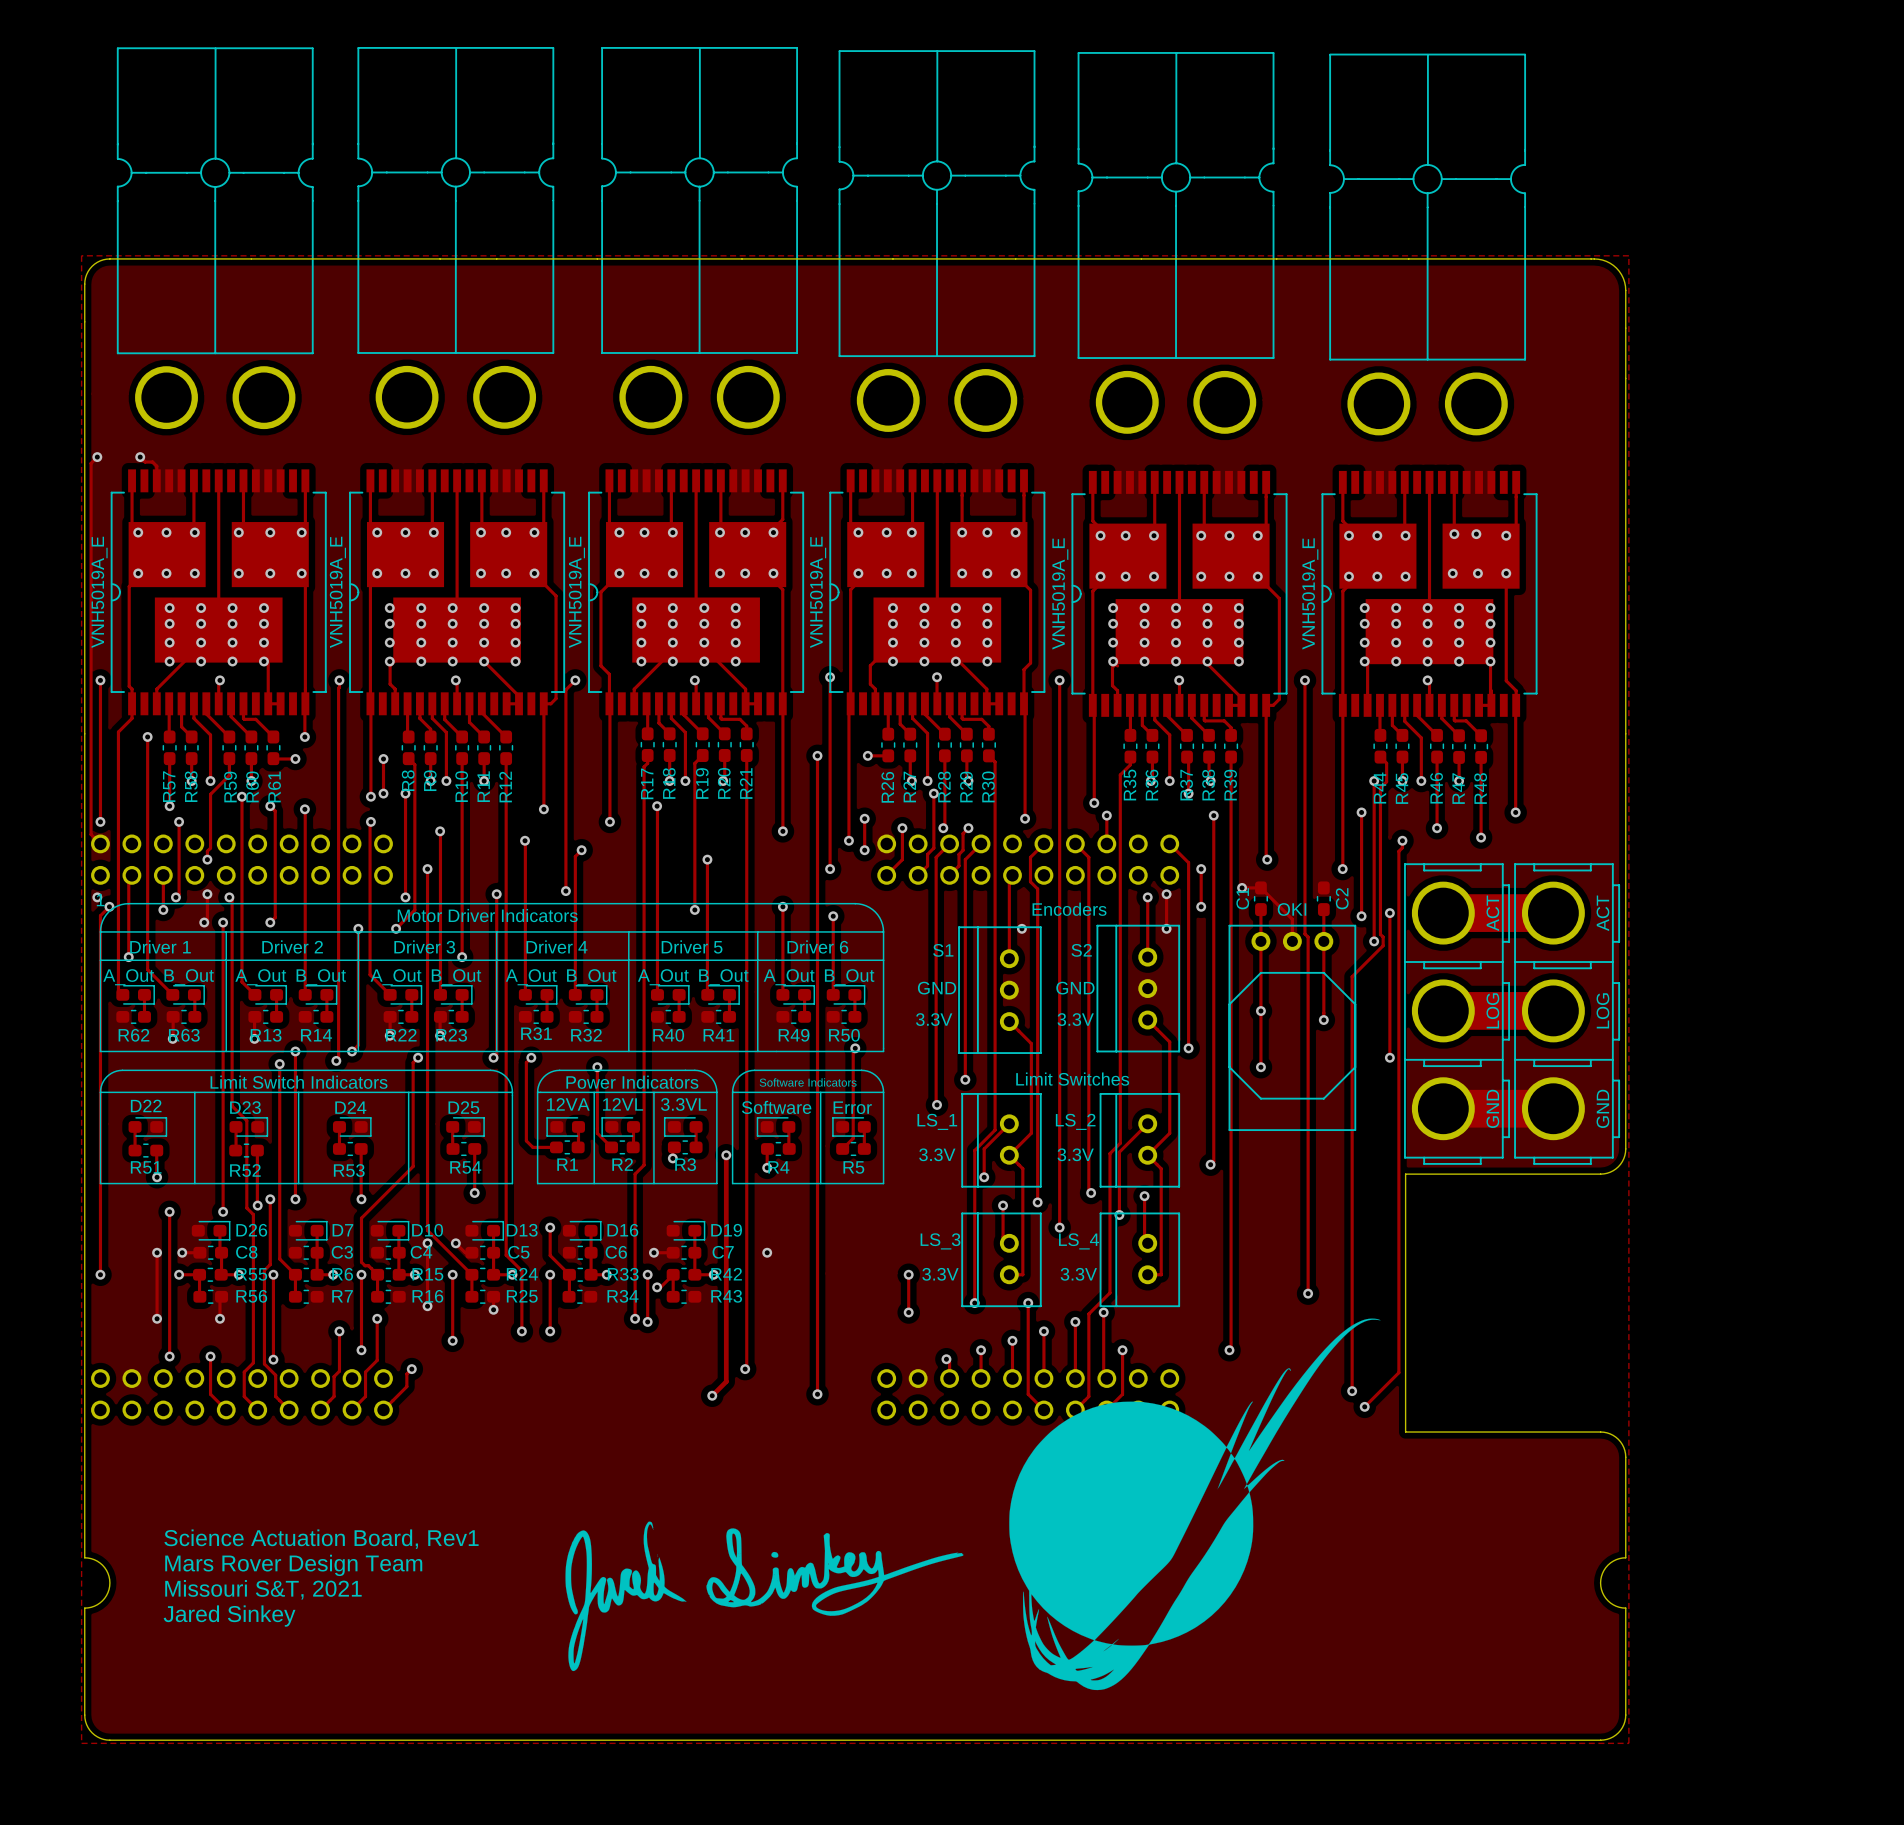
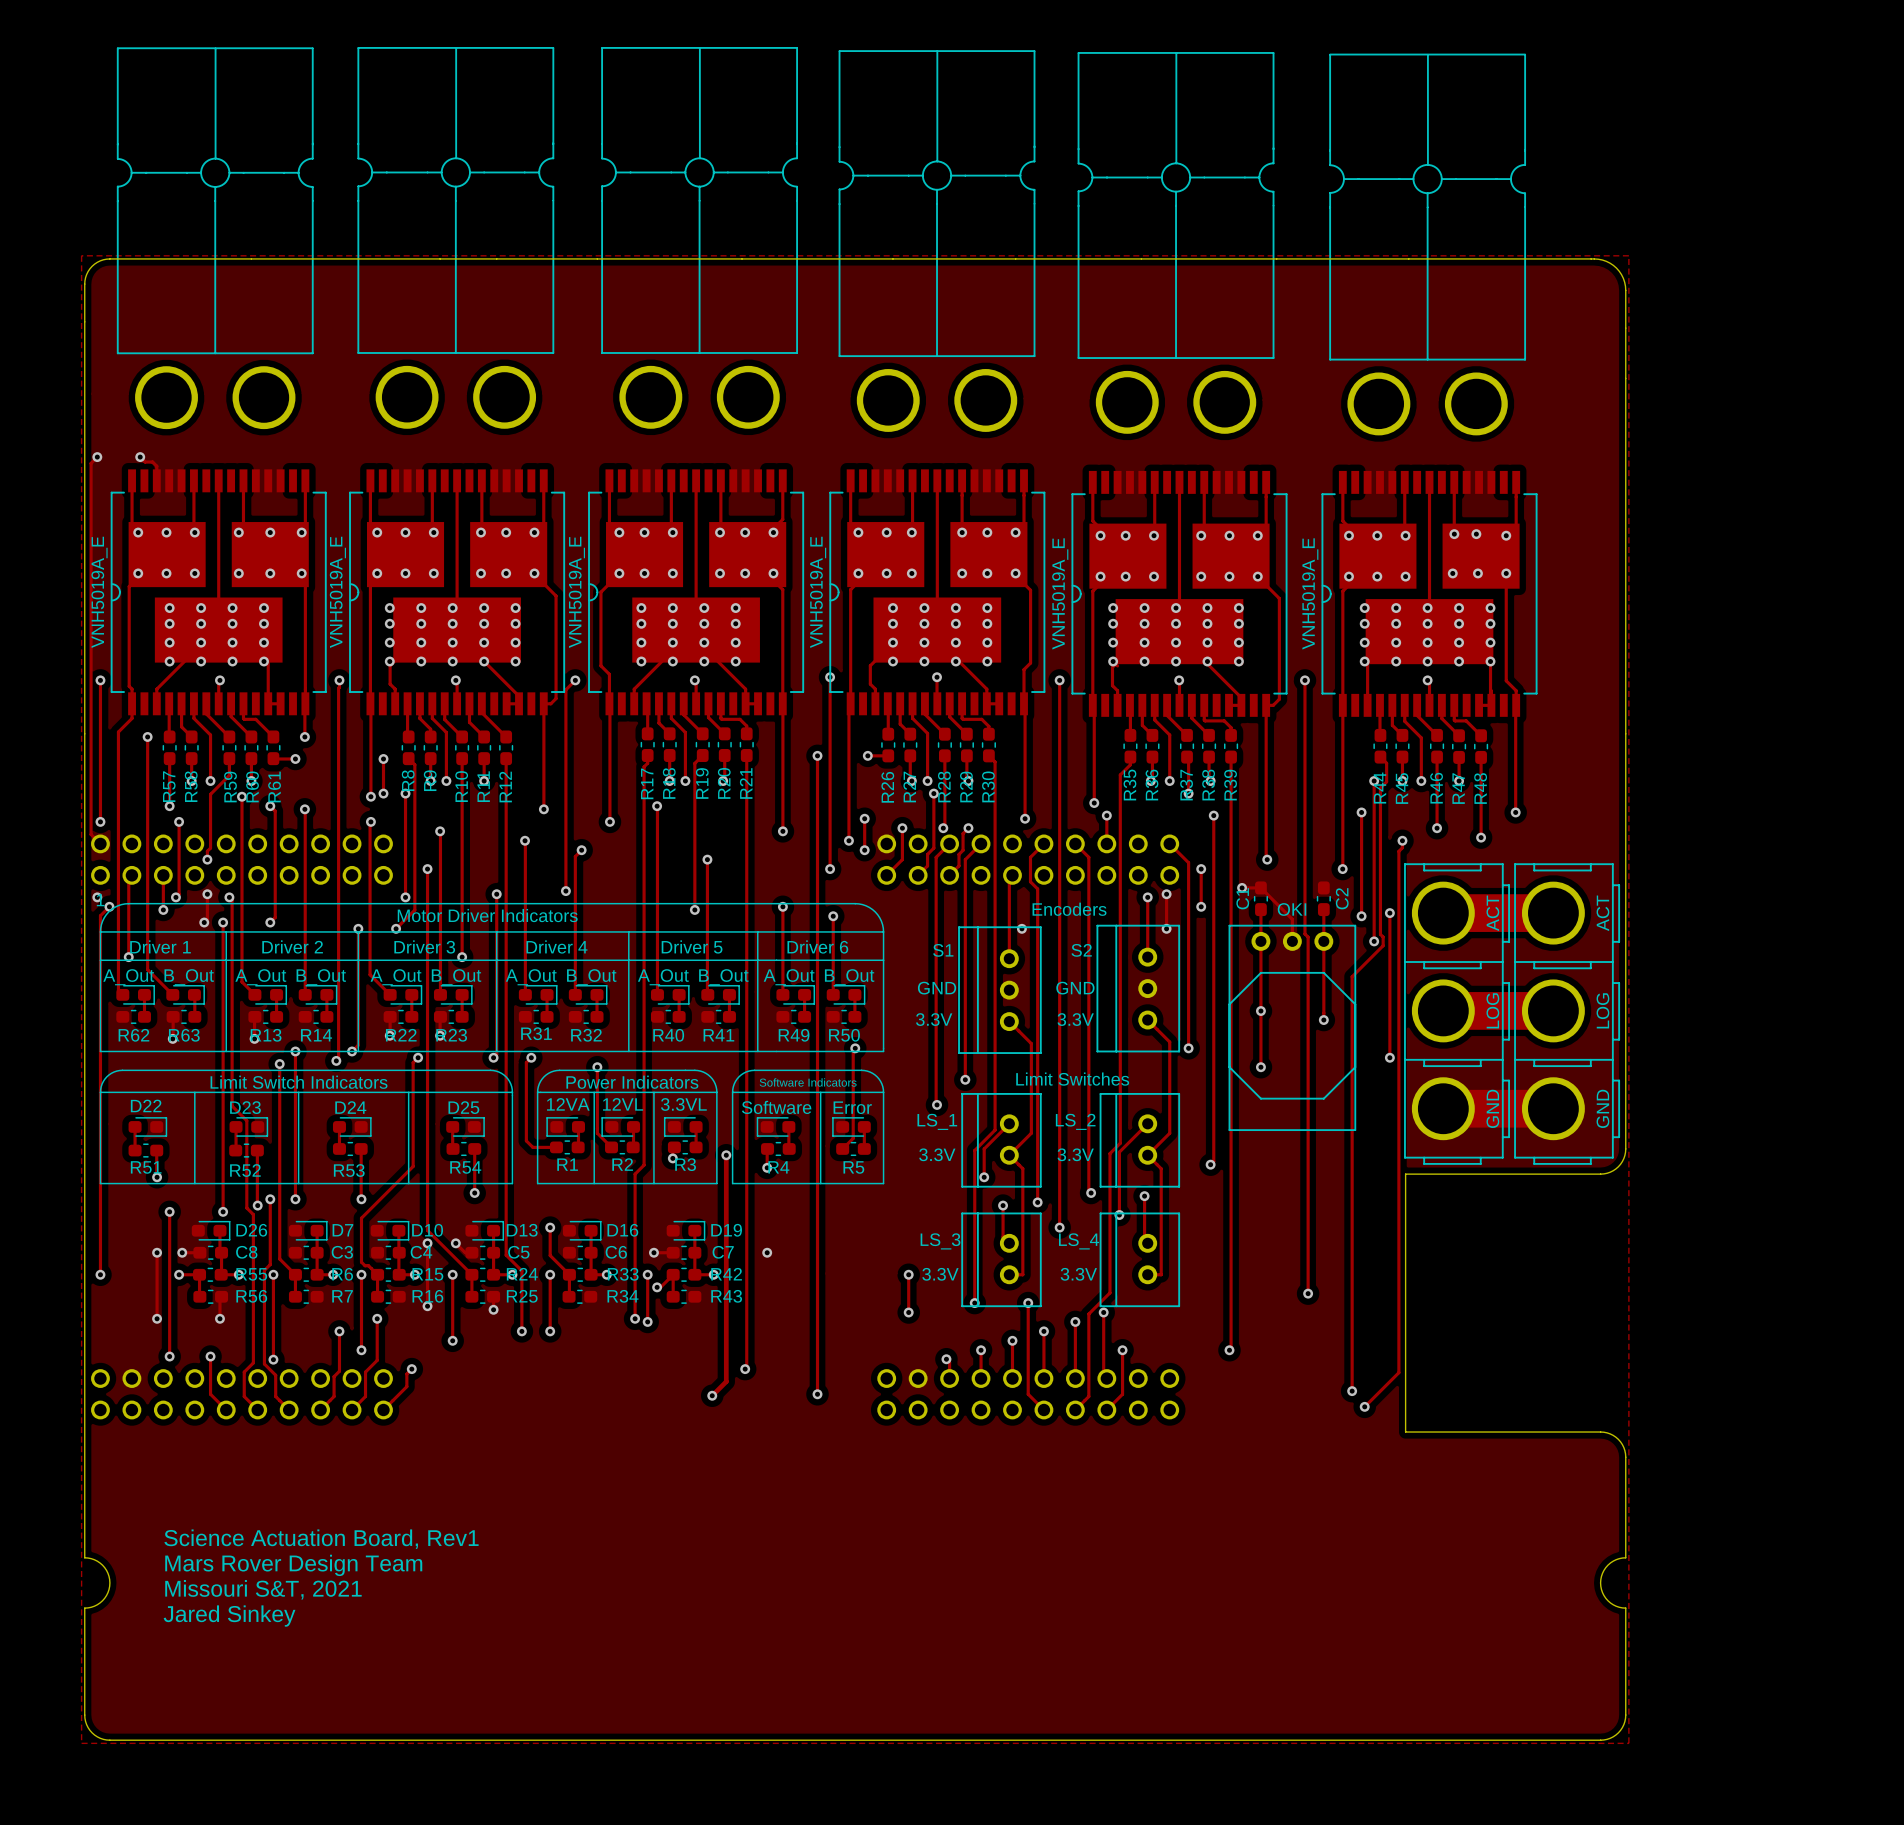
drawing: [1009, 1318, 1381, 1691] -> none
drawing: [565, 1521, 964, 1672] -> none

